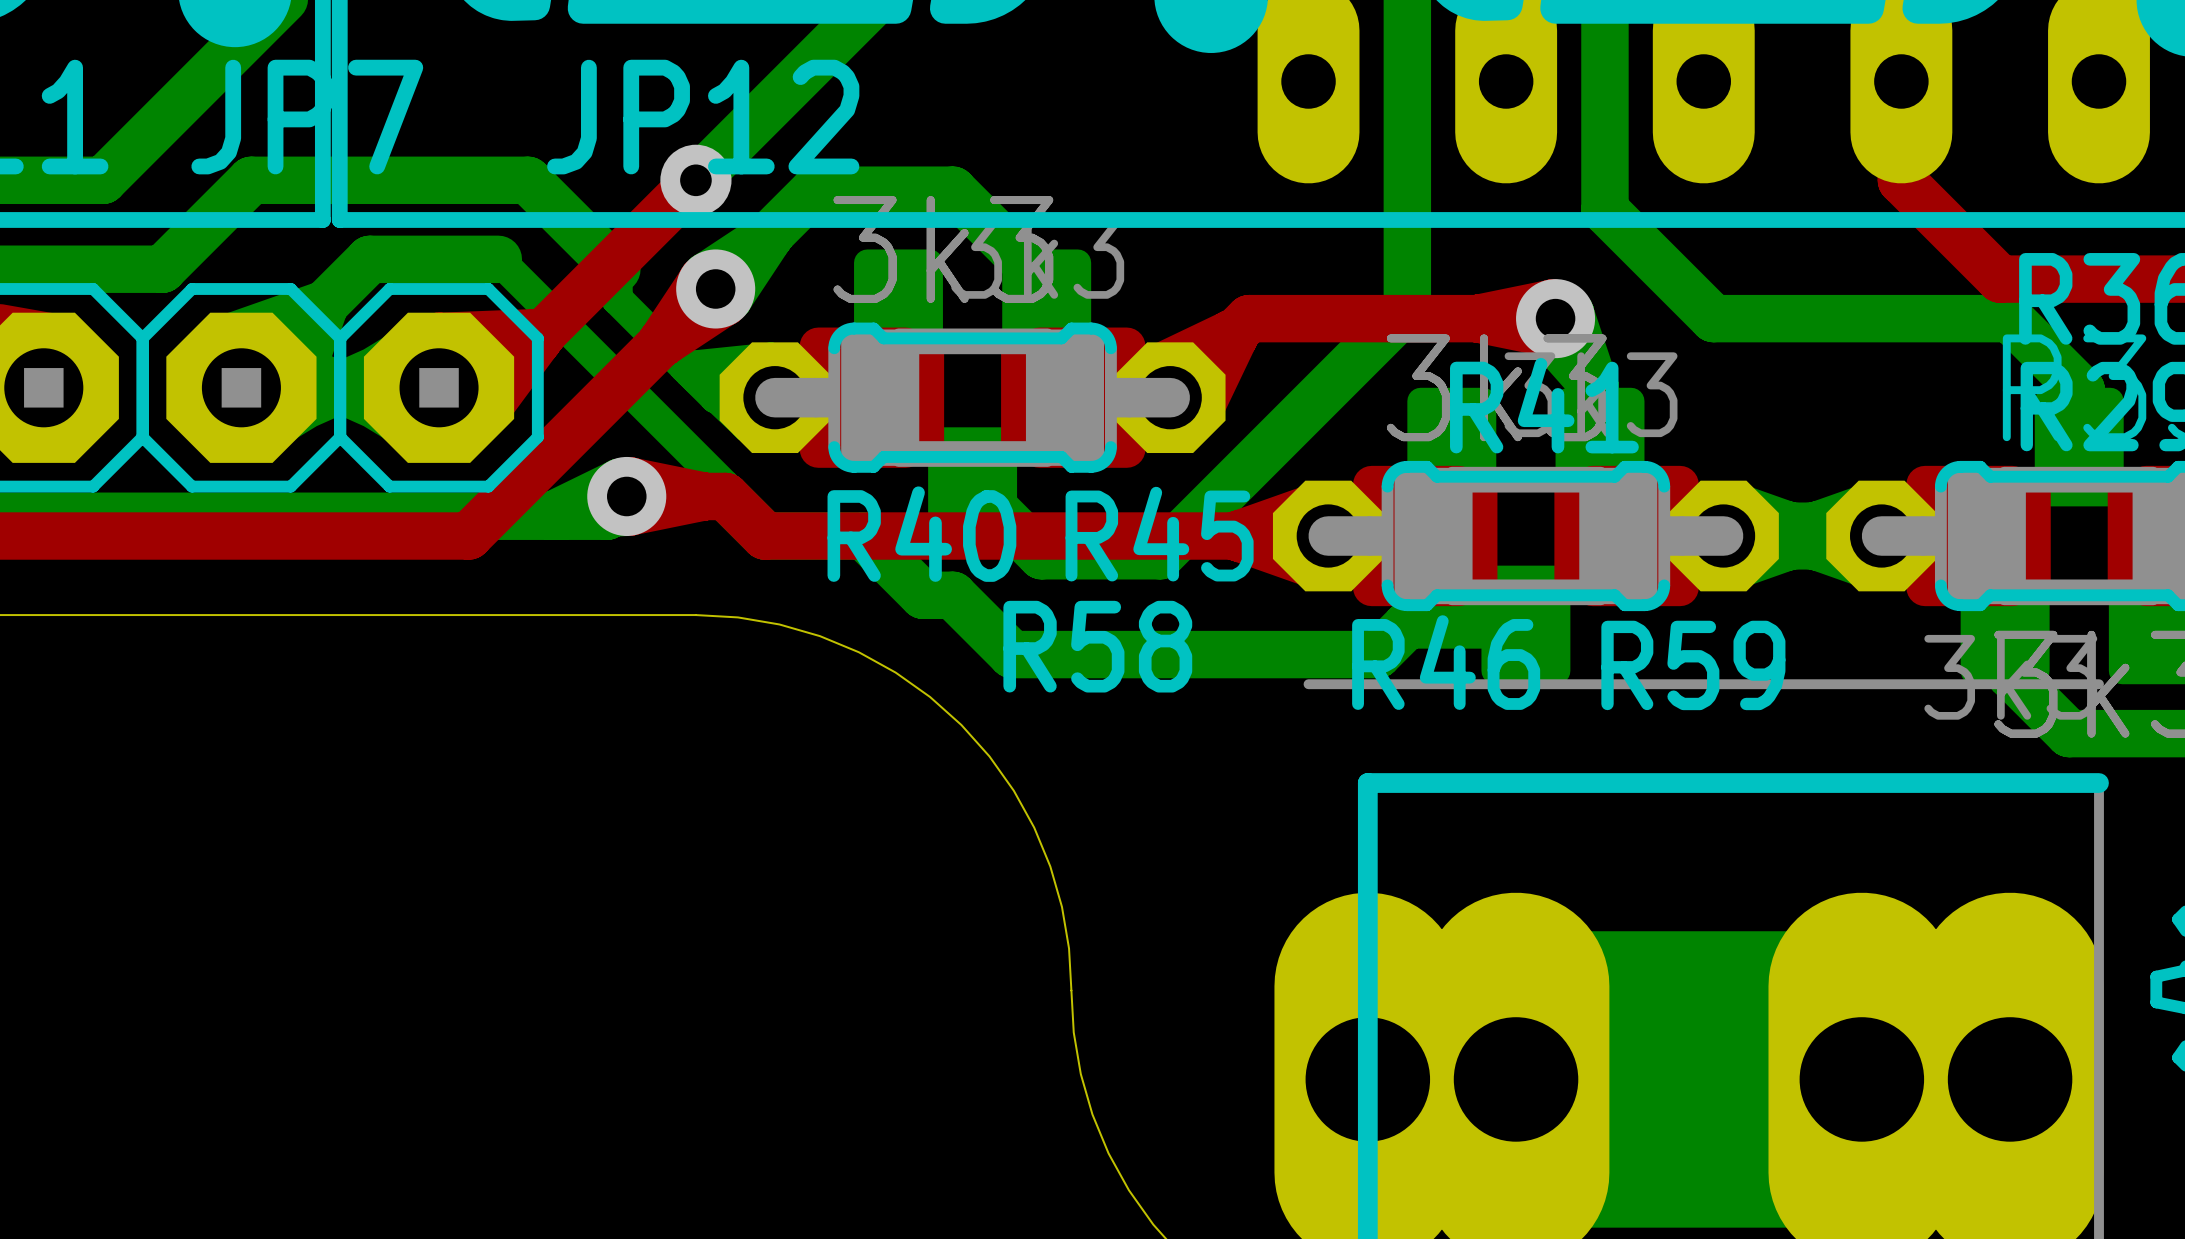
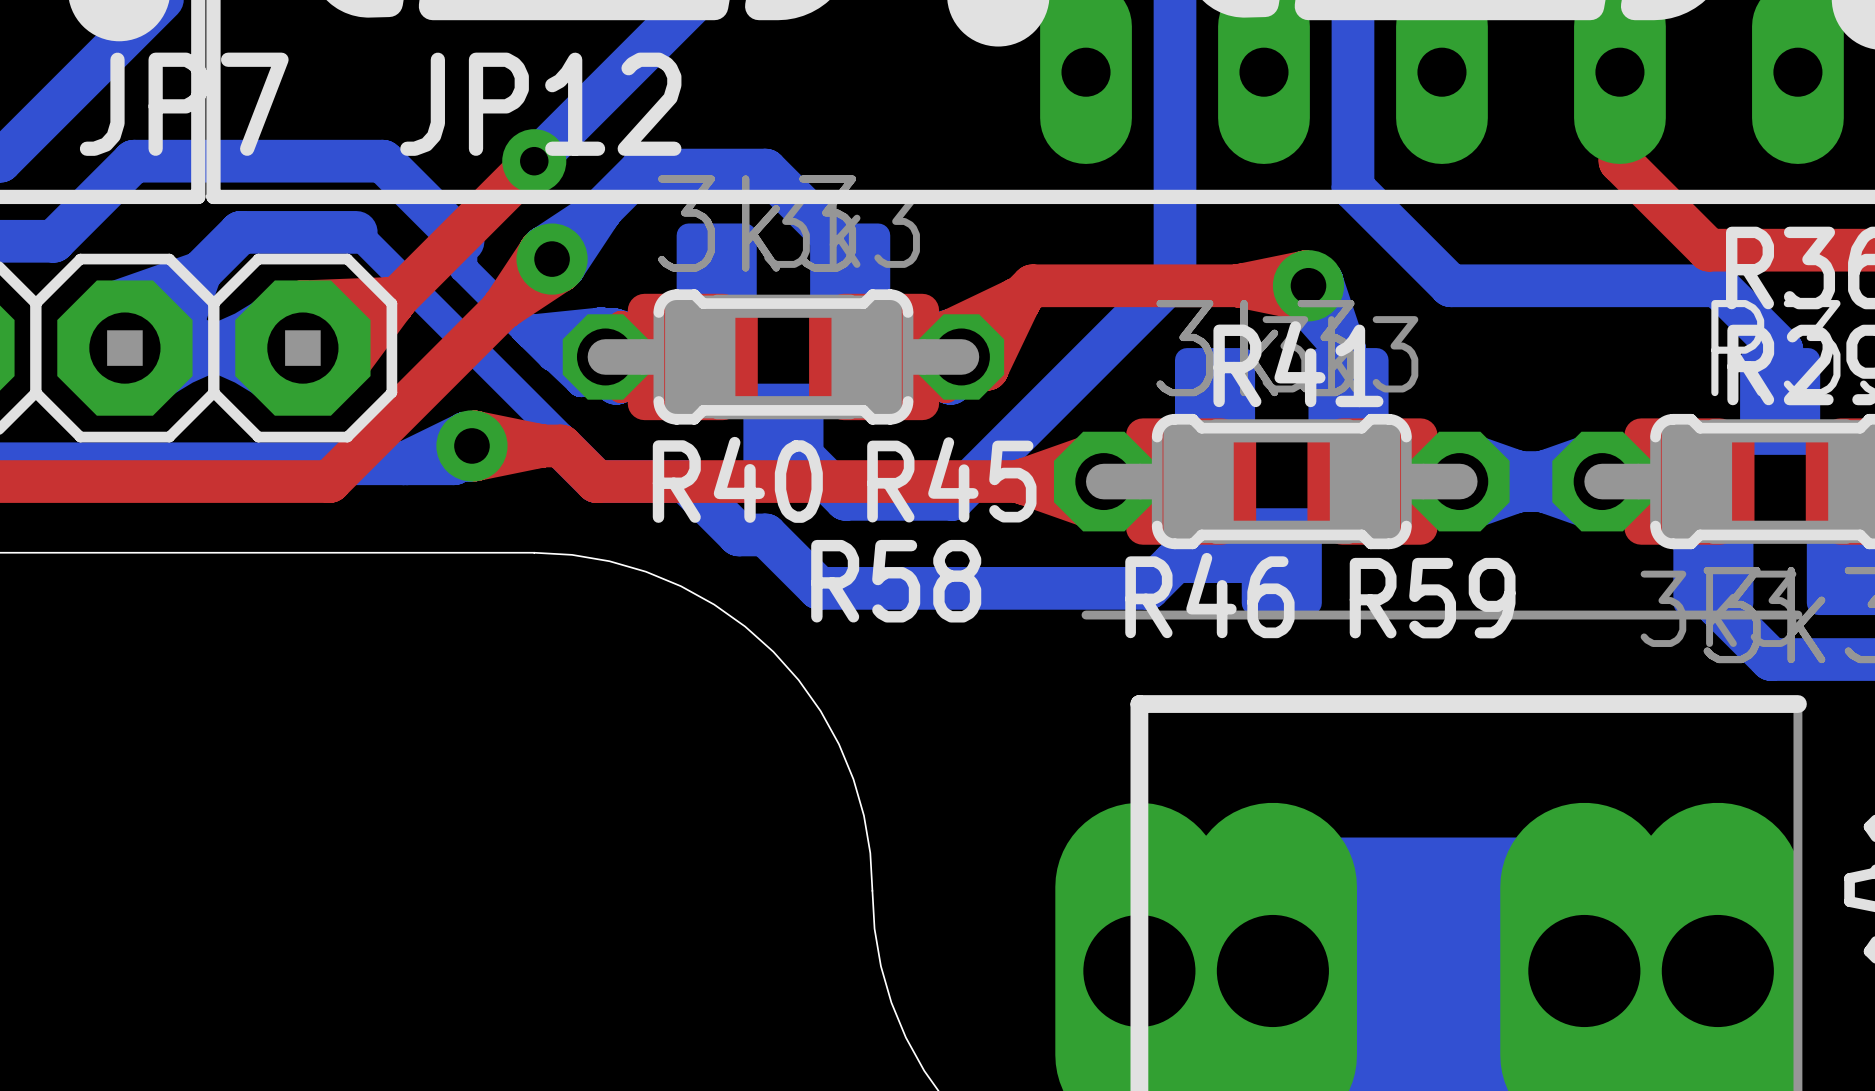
R58 footprint: [719, 322, 1226, 473] -> [562, 289, 1005, 425]

